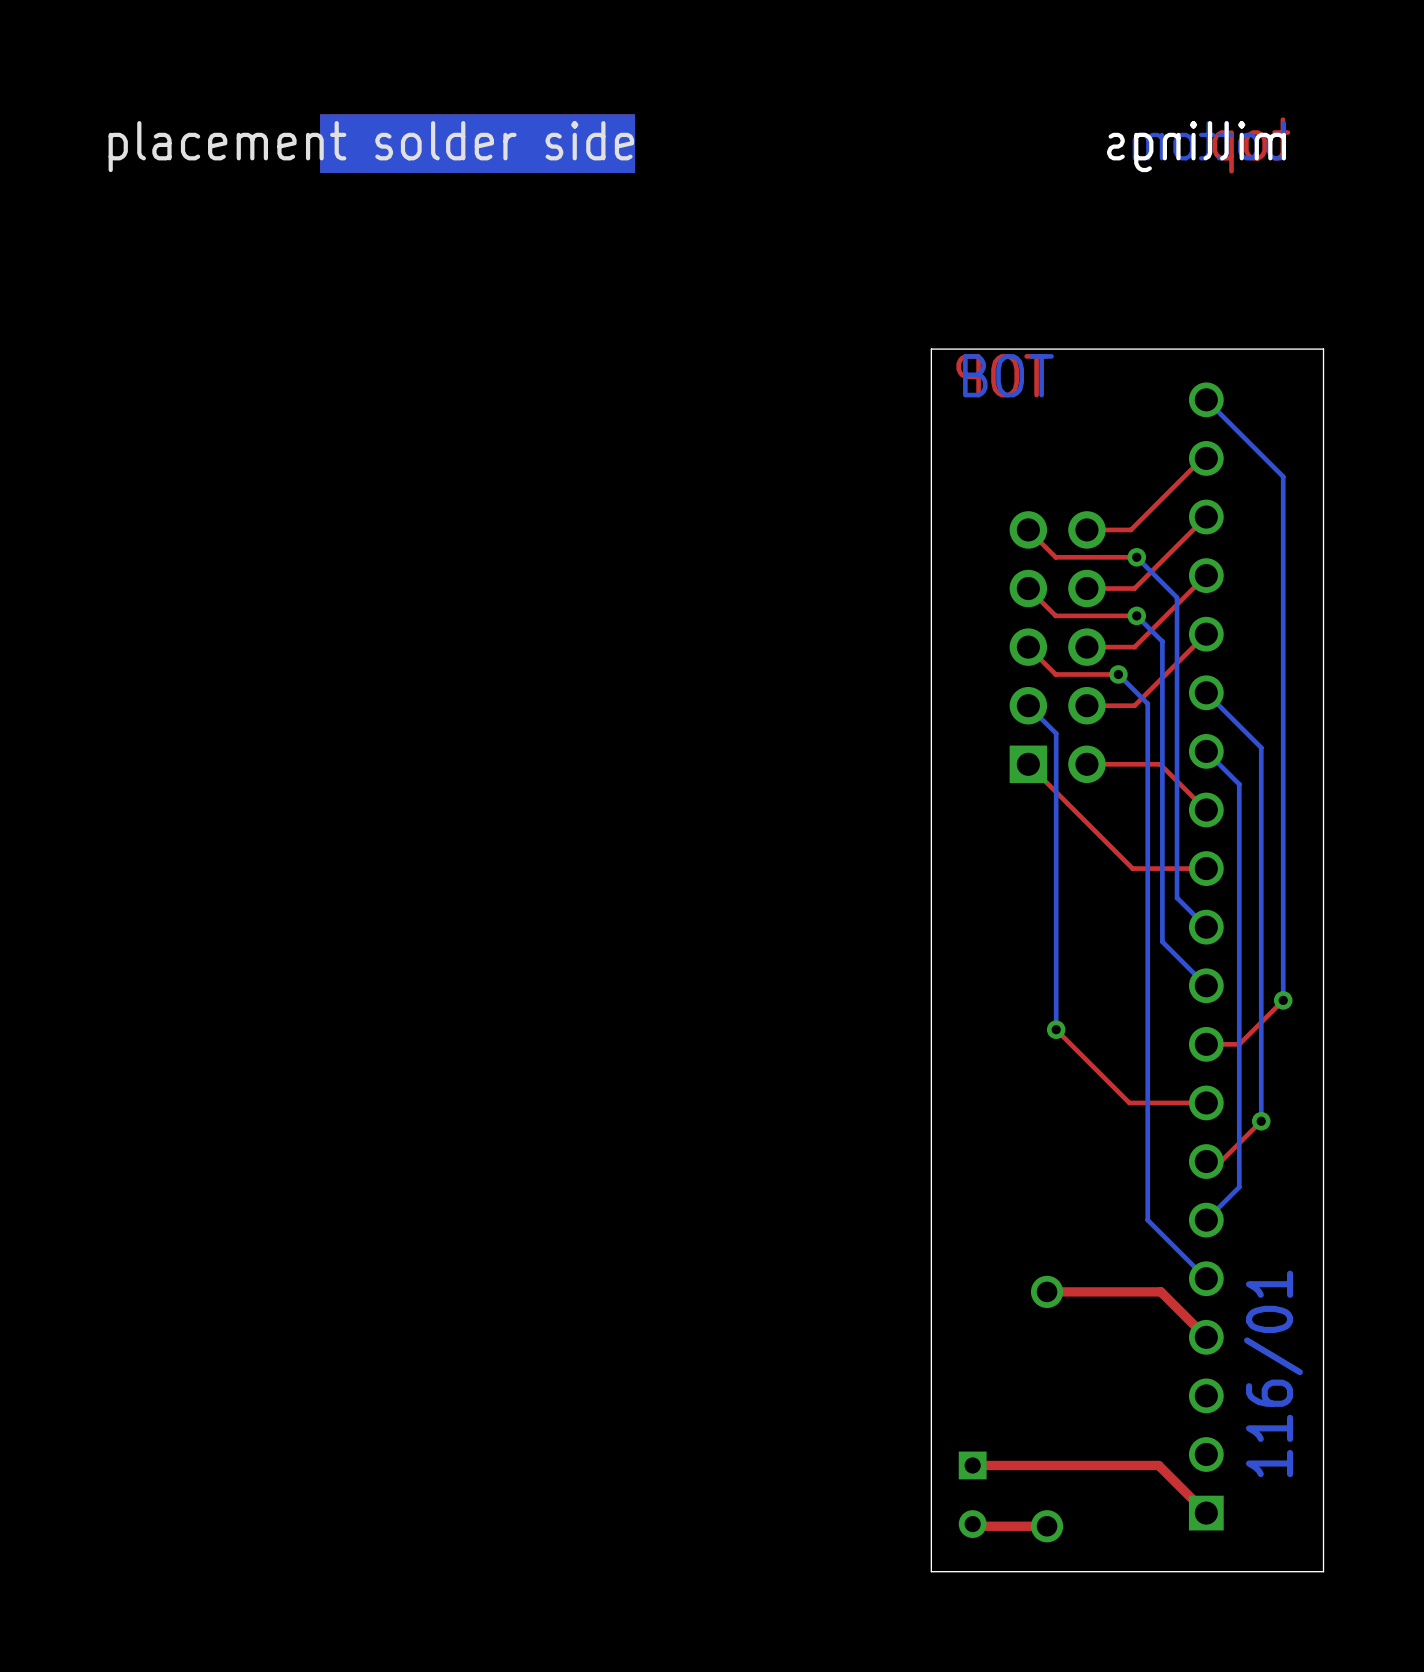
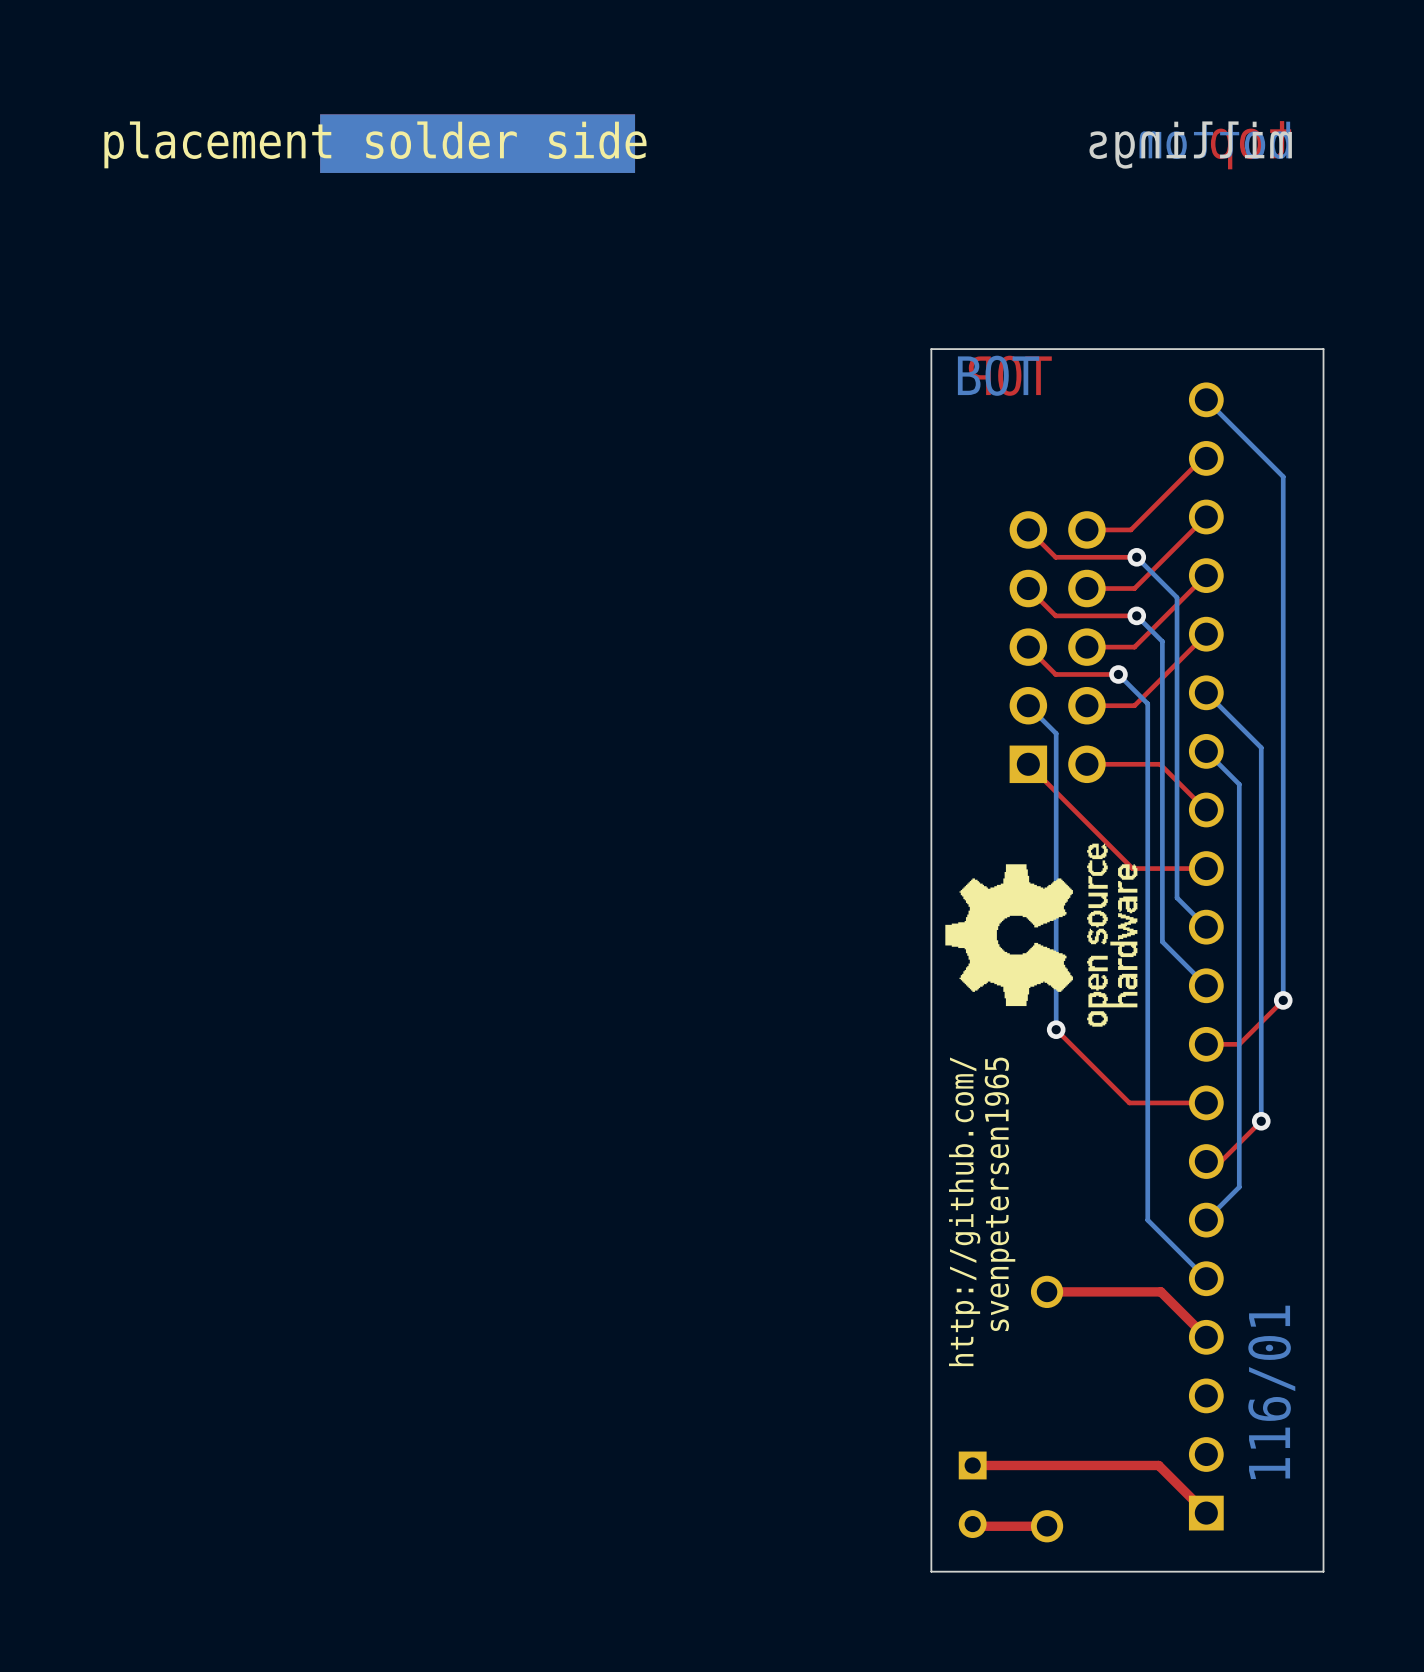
drawing: none -> [945, 843, 1138, 1027]
text: none -> svenpetersen1965 (999, 1194)
text: none -> http://github.com/ (964, 1211)

